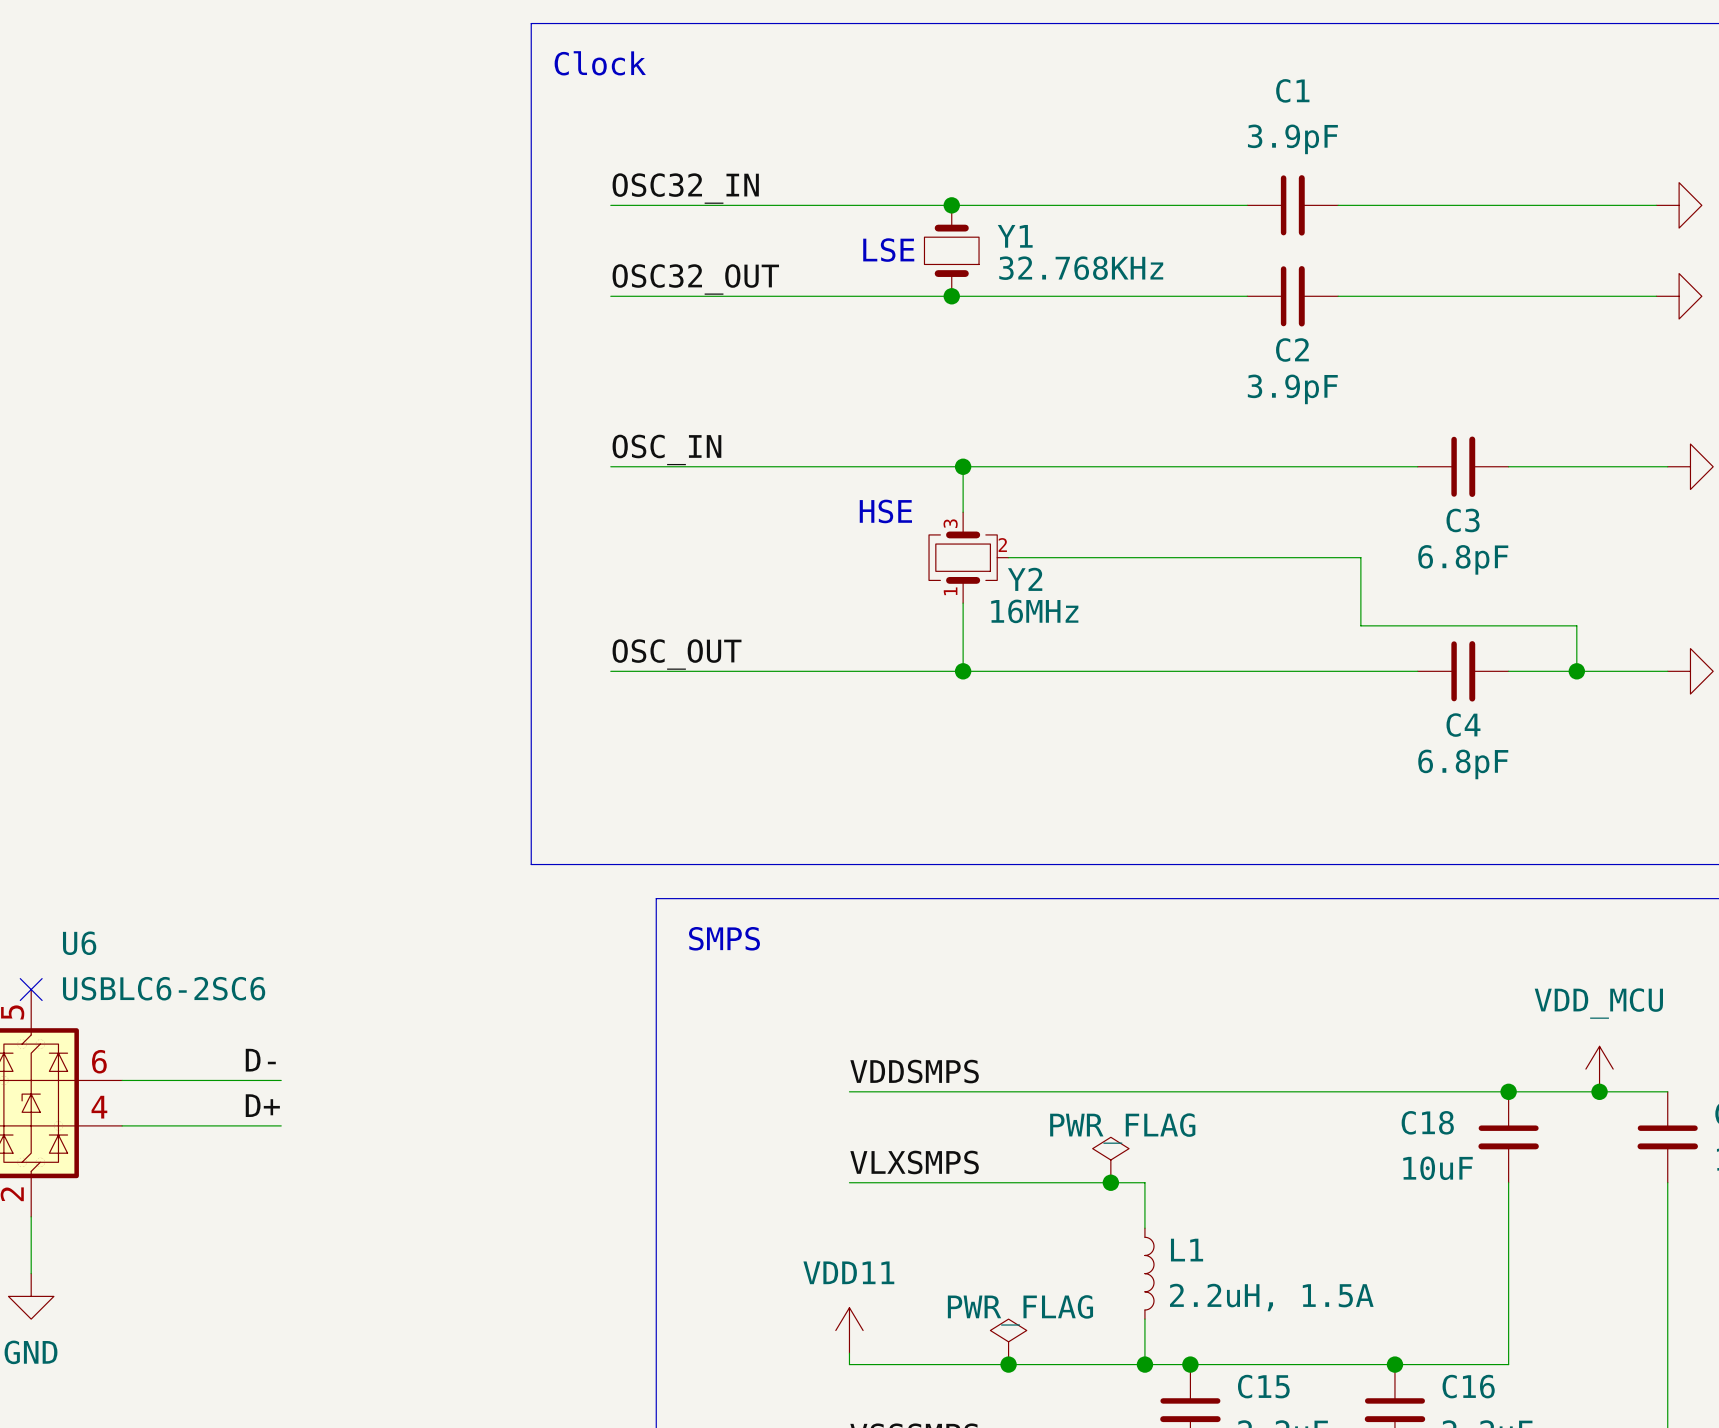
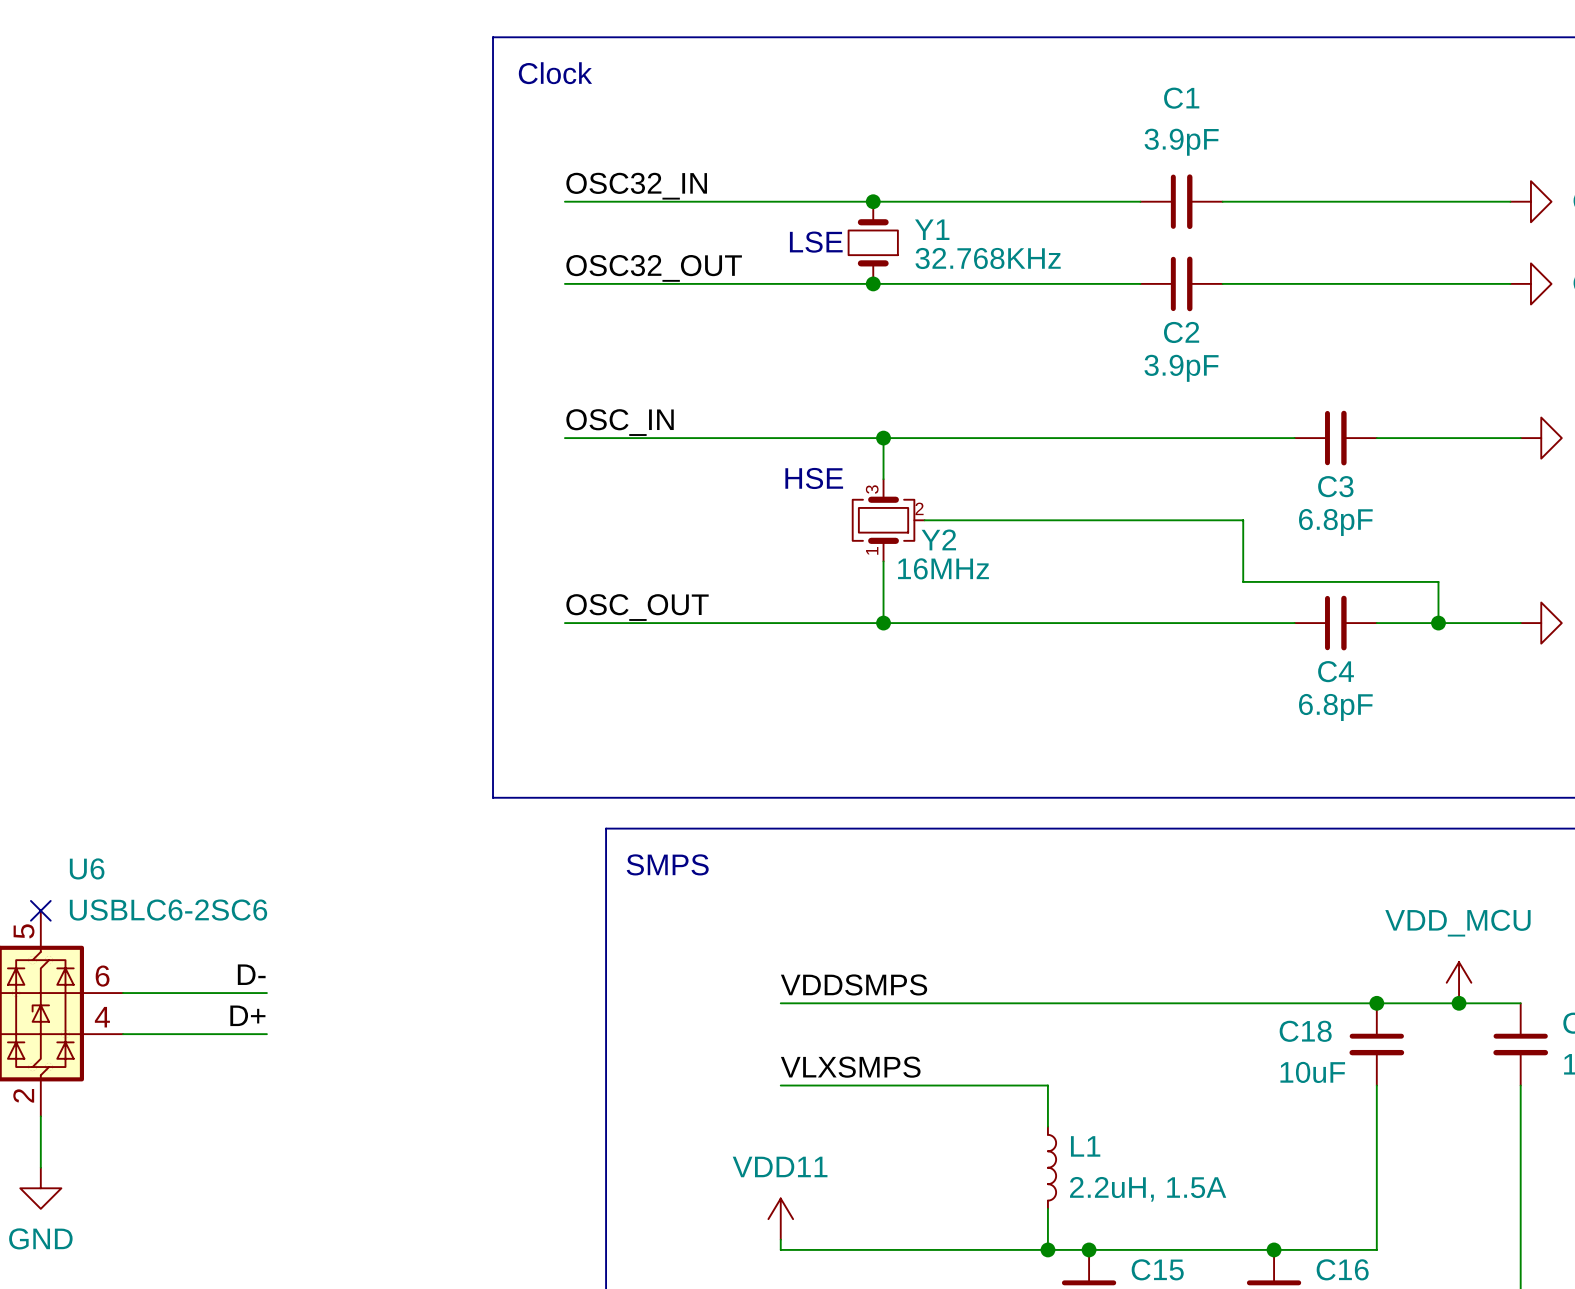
power symbol: PWR_FLAG (1110, 1160) -> none
junction: (1110, 1182) -> none
power symbol: PWR_FLAG (1008, 1341) -> none
junction: (1008, 1364) -> none

